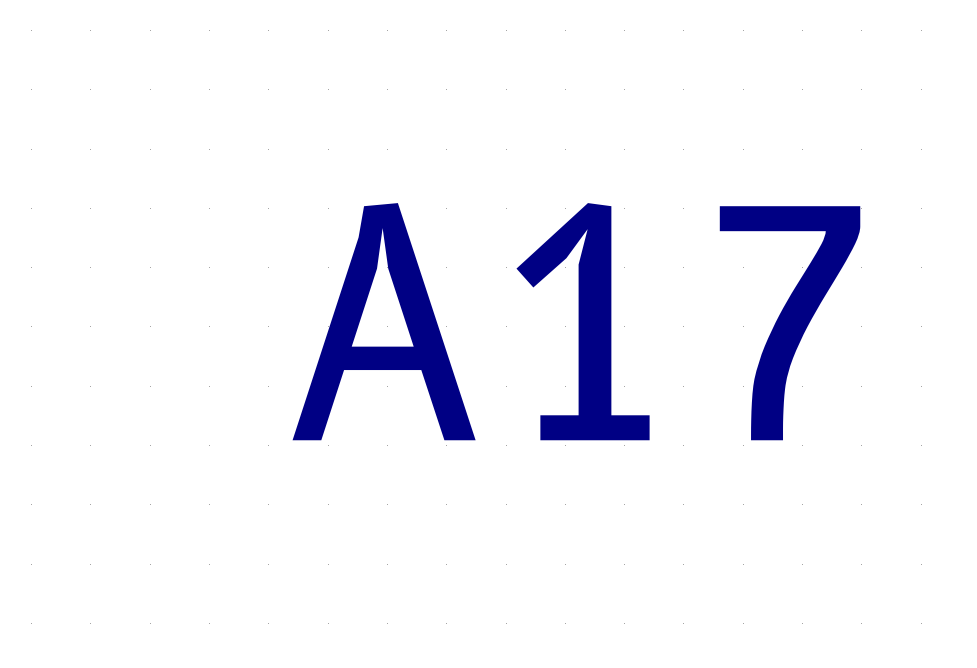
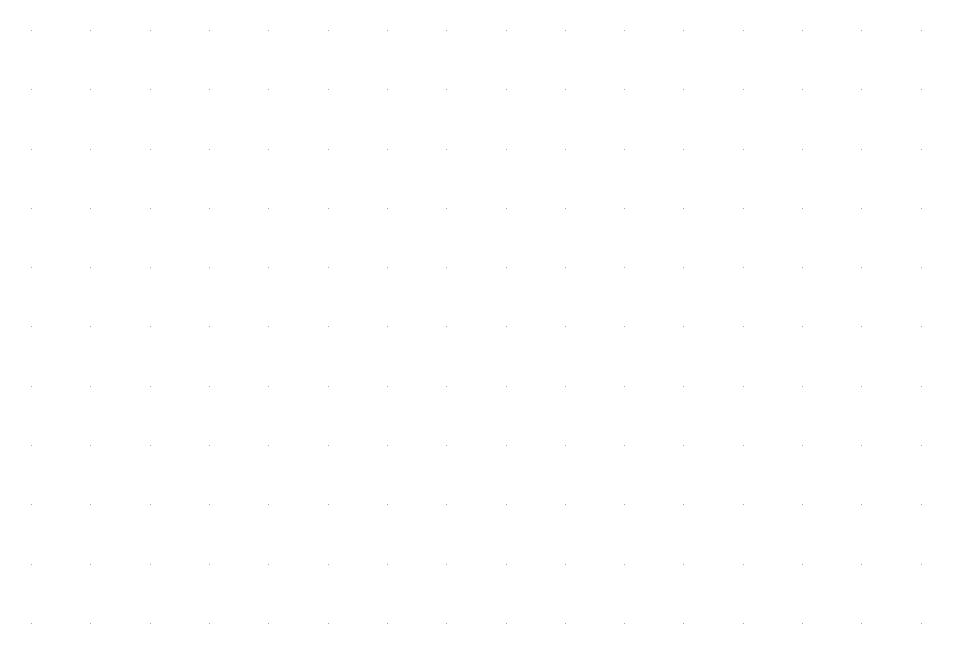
text: A17 (576, 321) -> none

